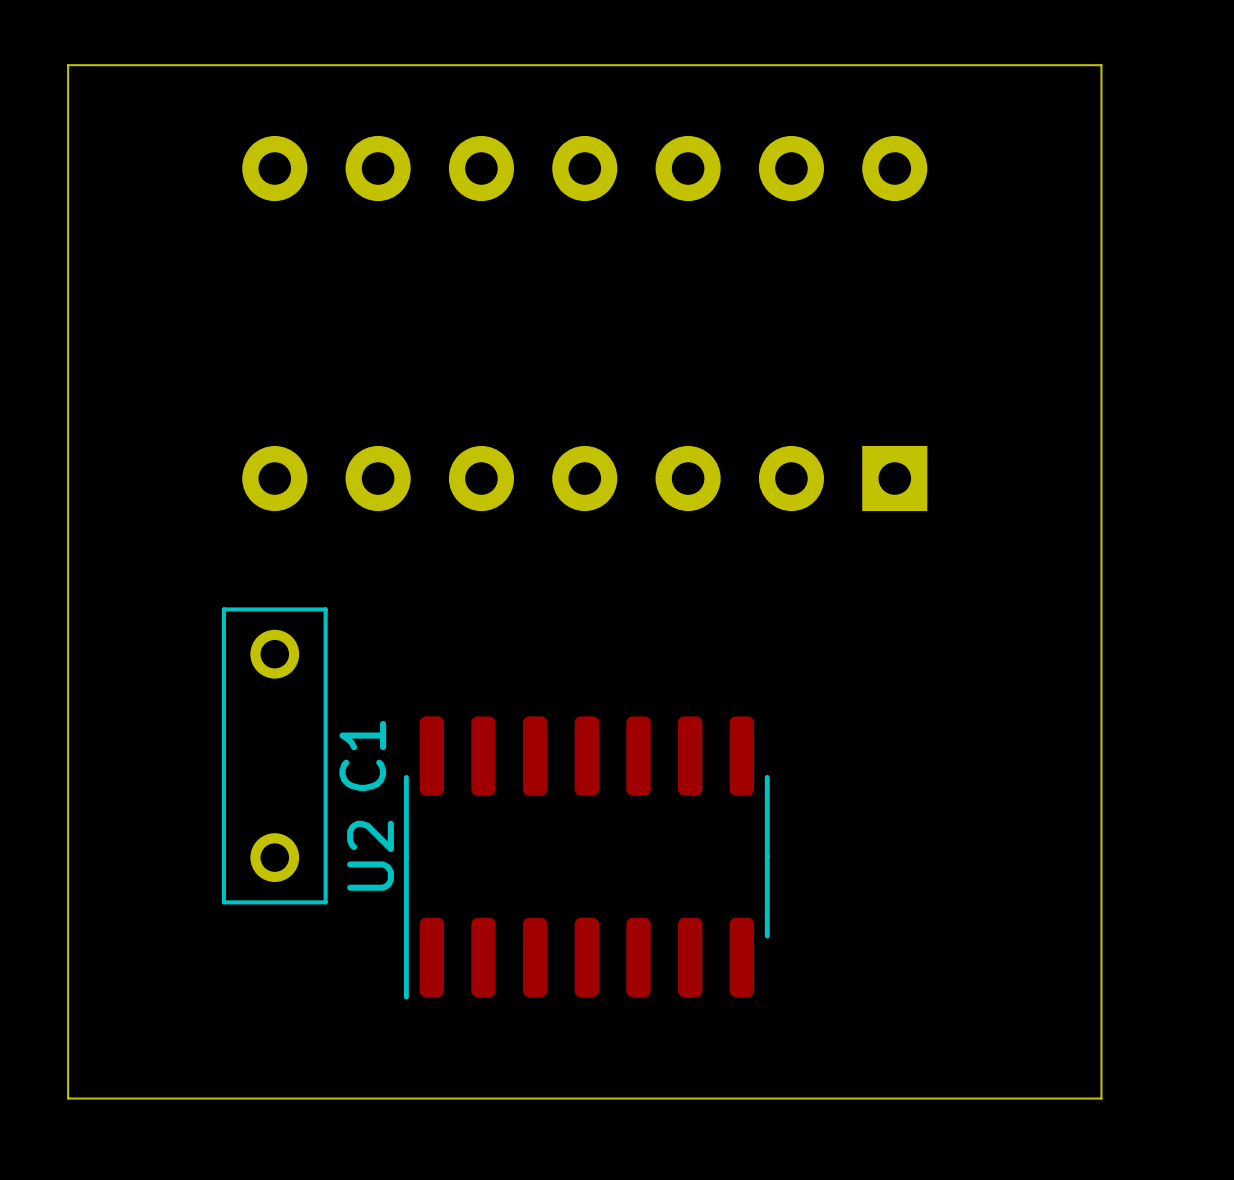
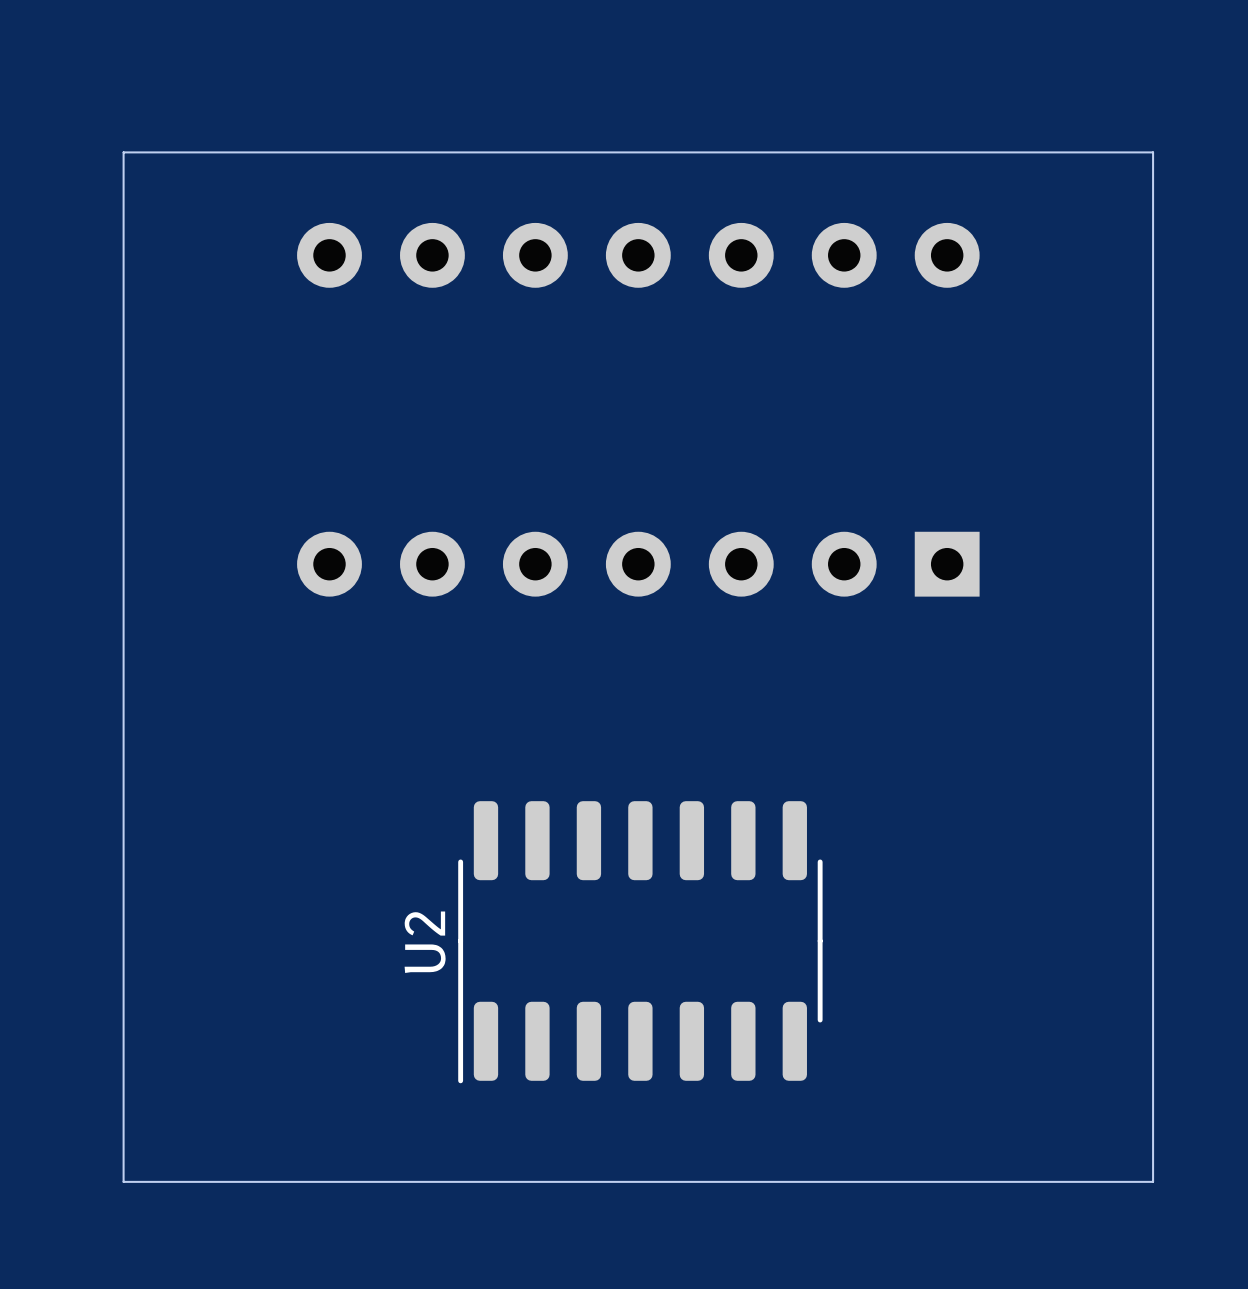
C1: (274, 755) -> none

